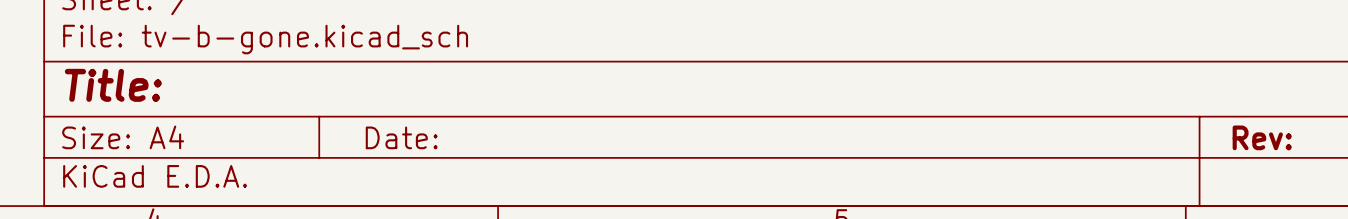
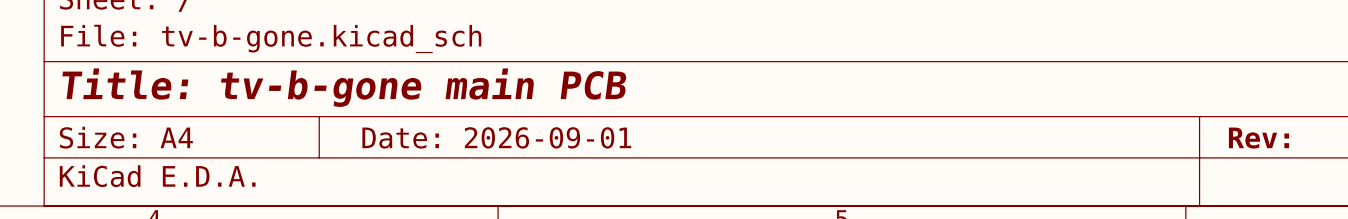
title block: Title: (113, 85) -> Title: tv-b-gone main PCB (344, 87)
title block: Date: (401, 137) -> Date: 2026-09-01 (496, 137)

